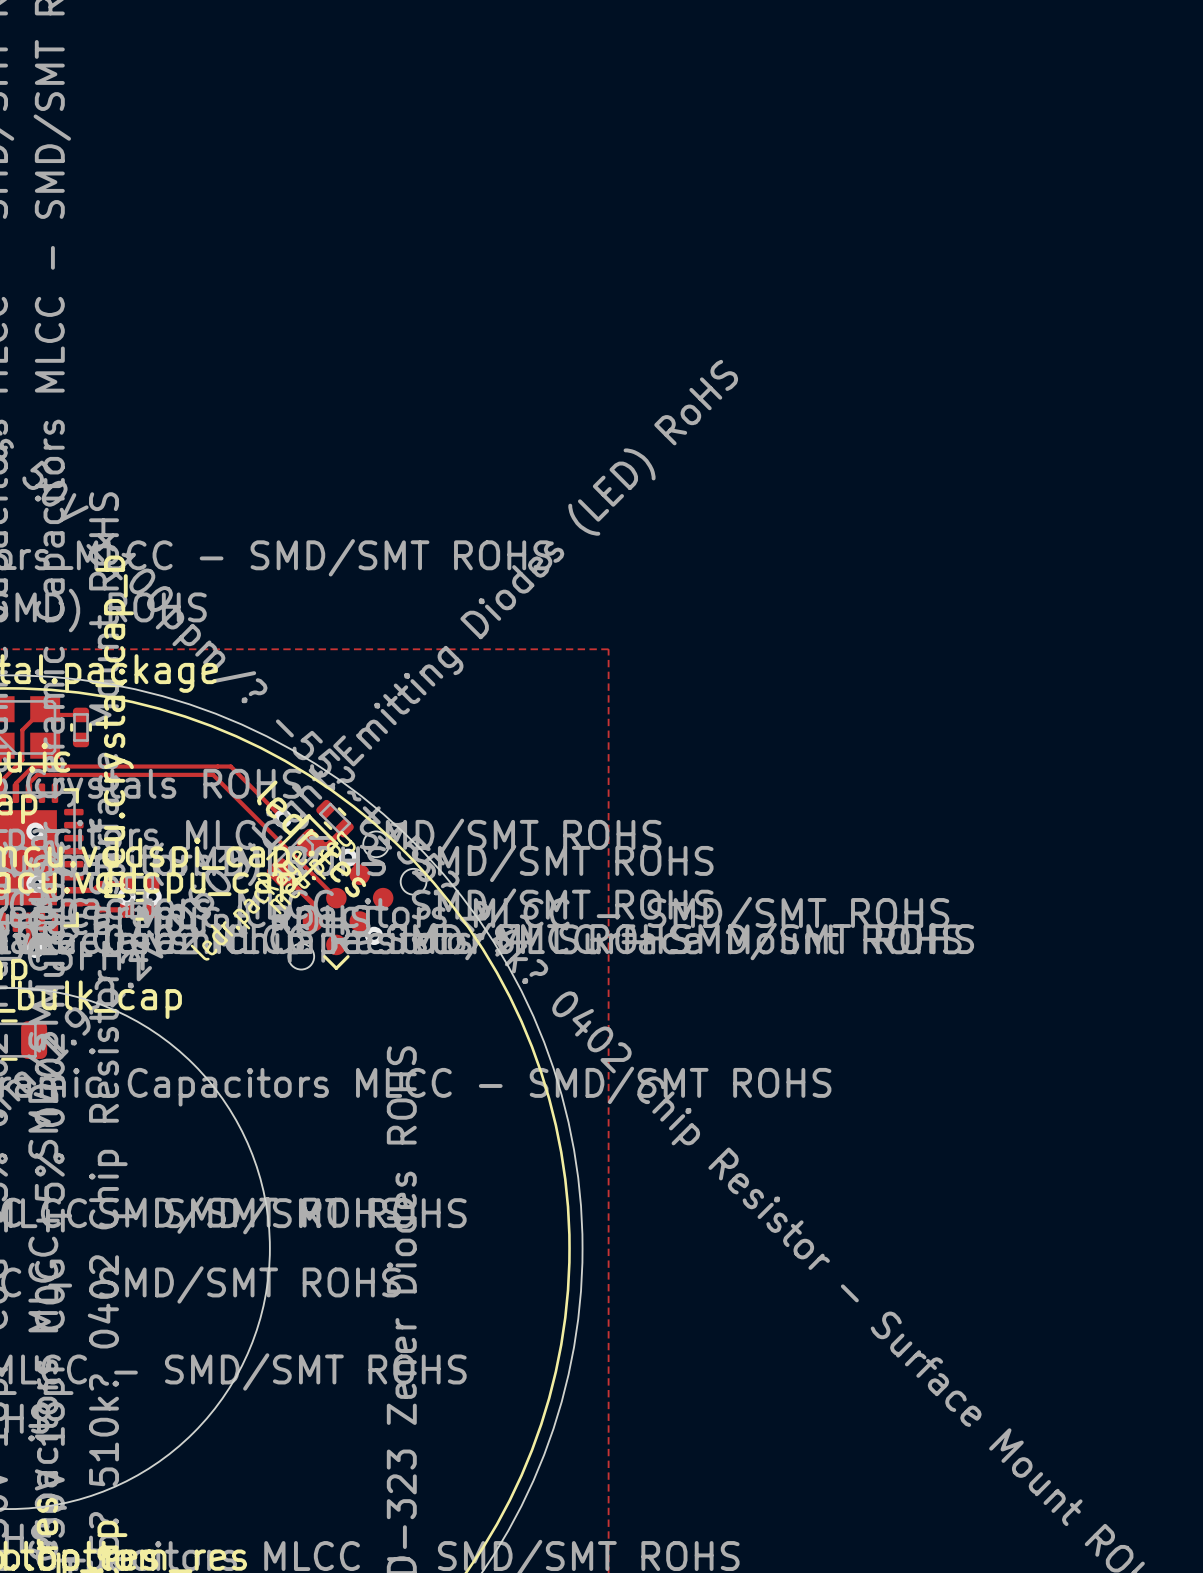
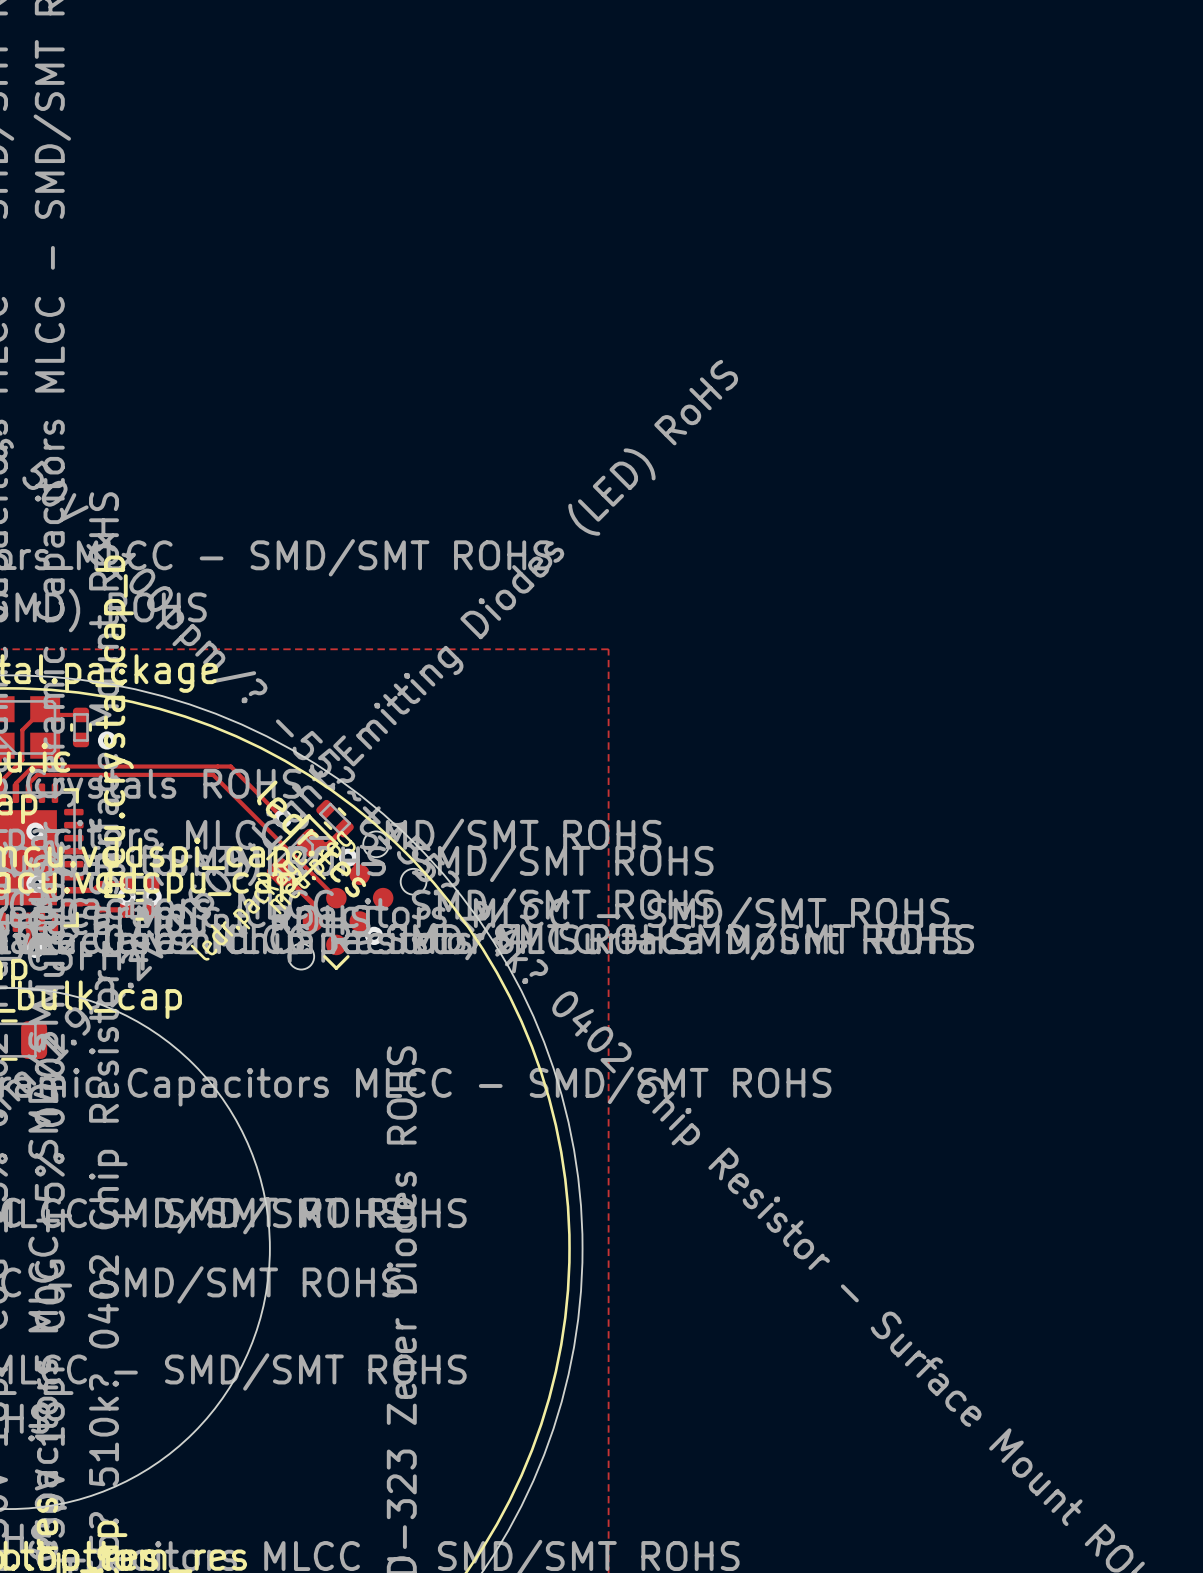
via: none -> (107, 740)

